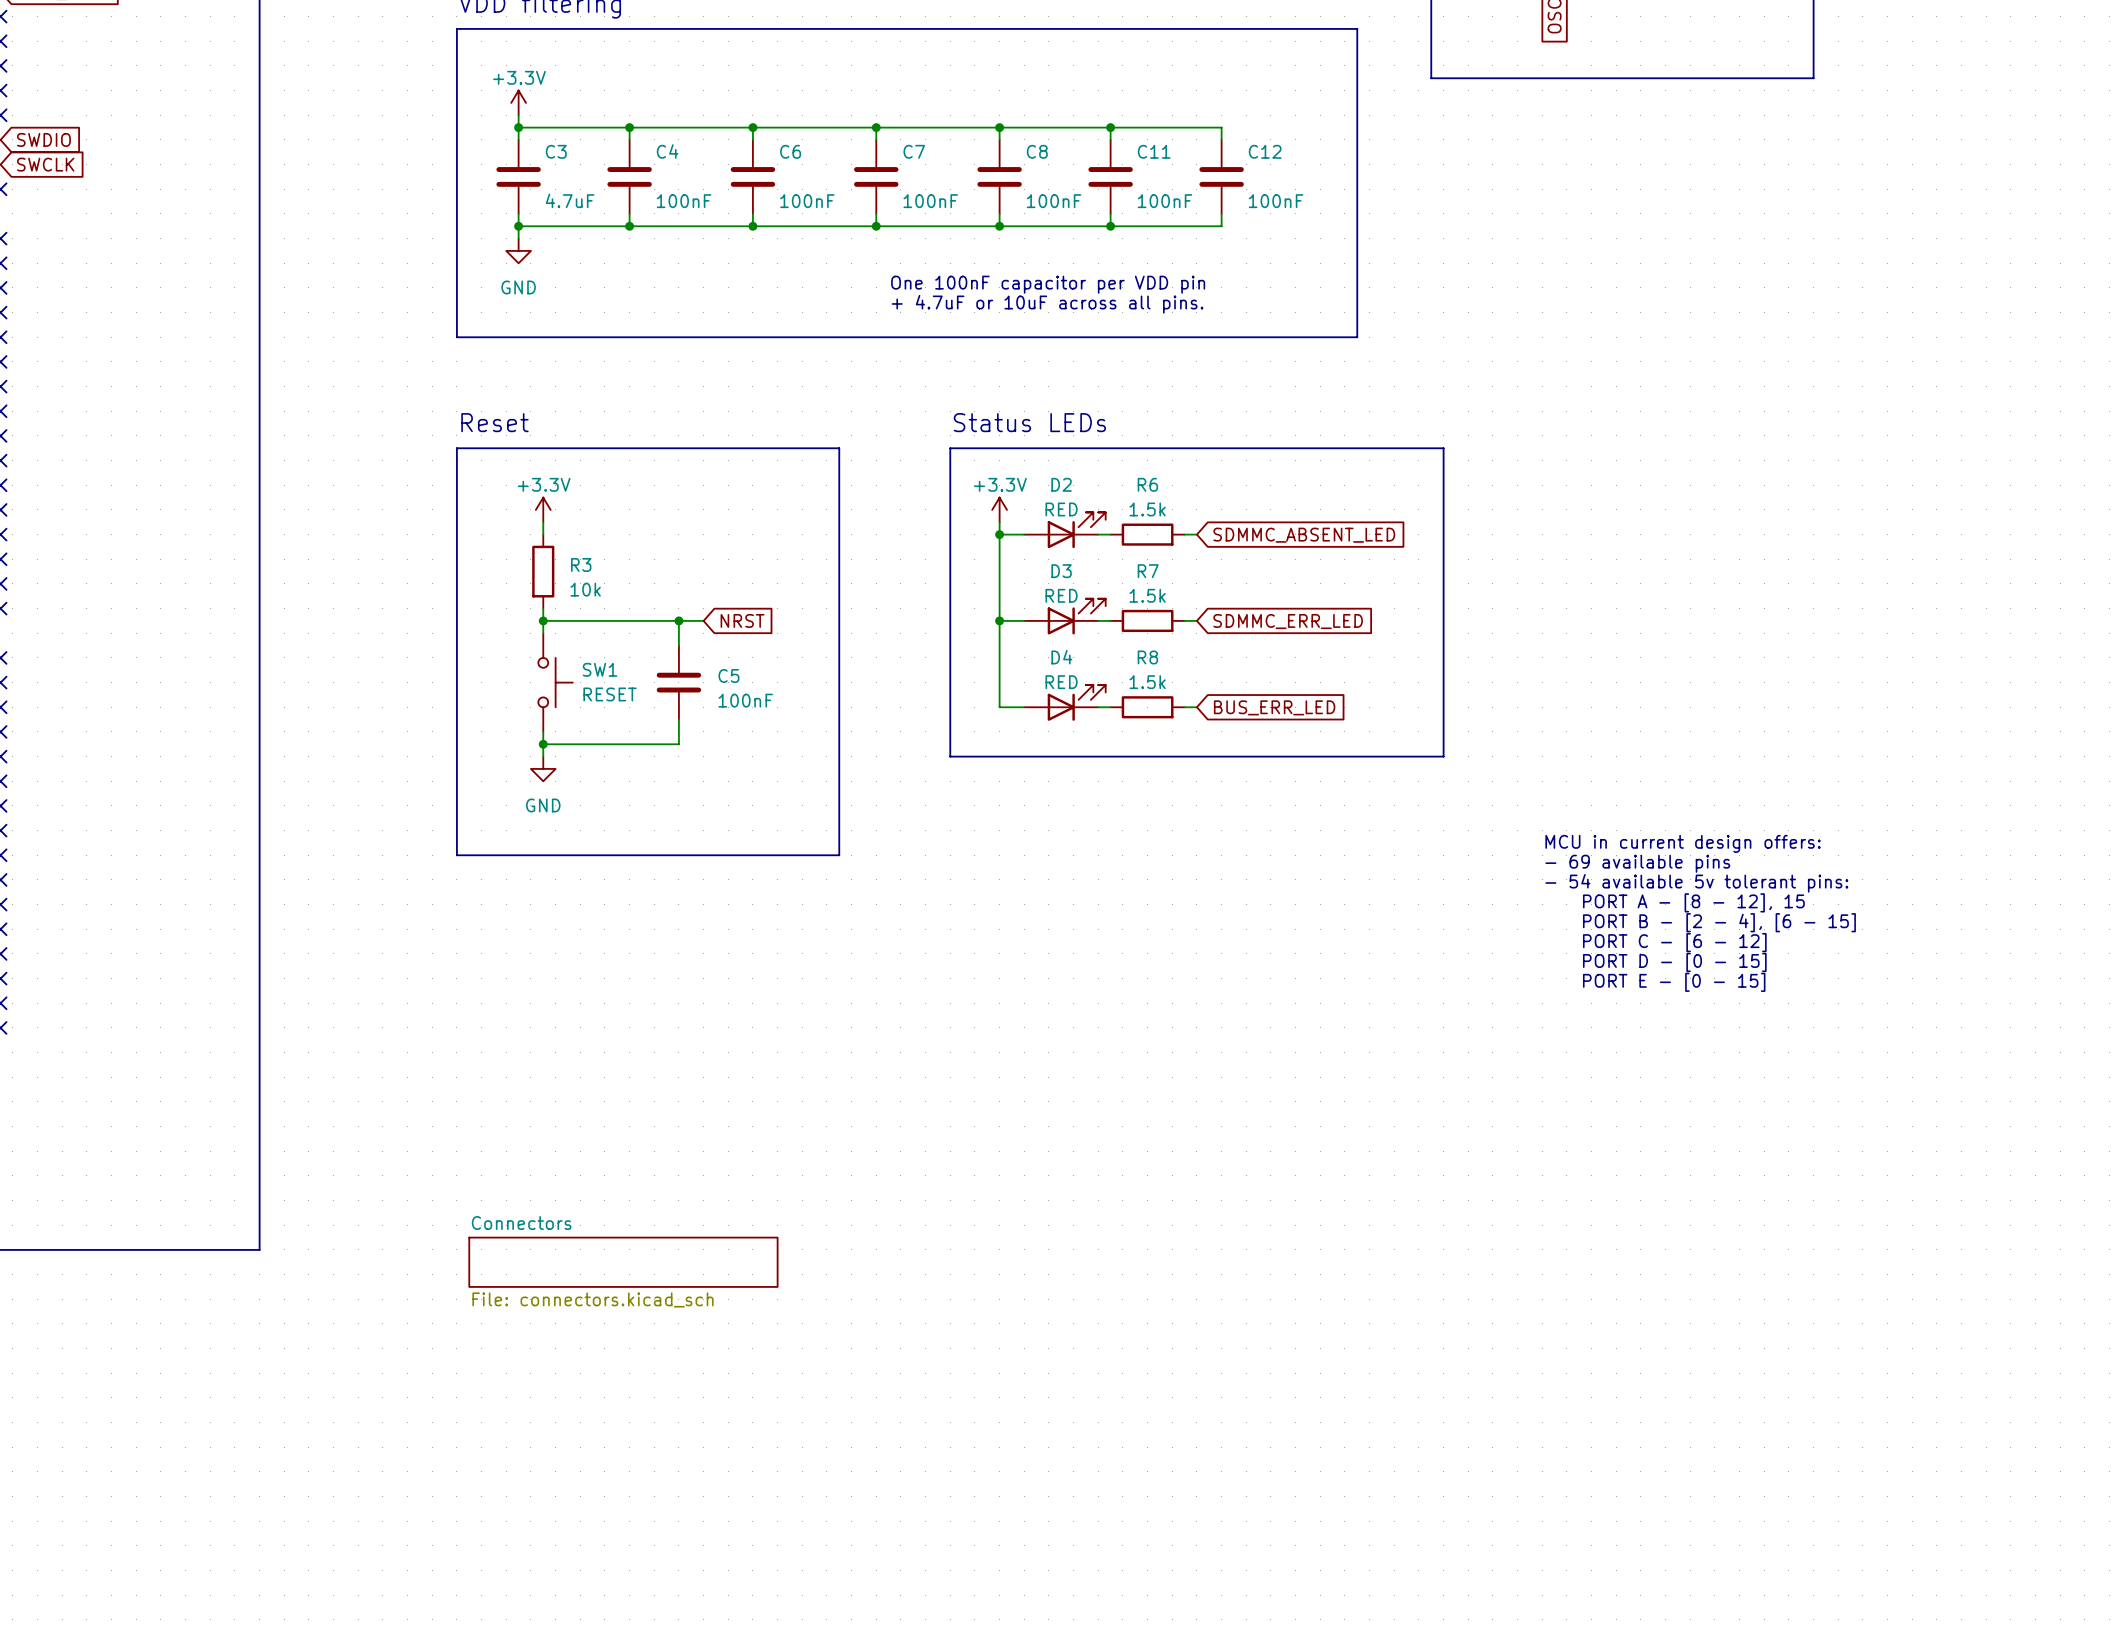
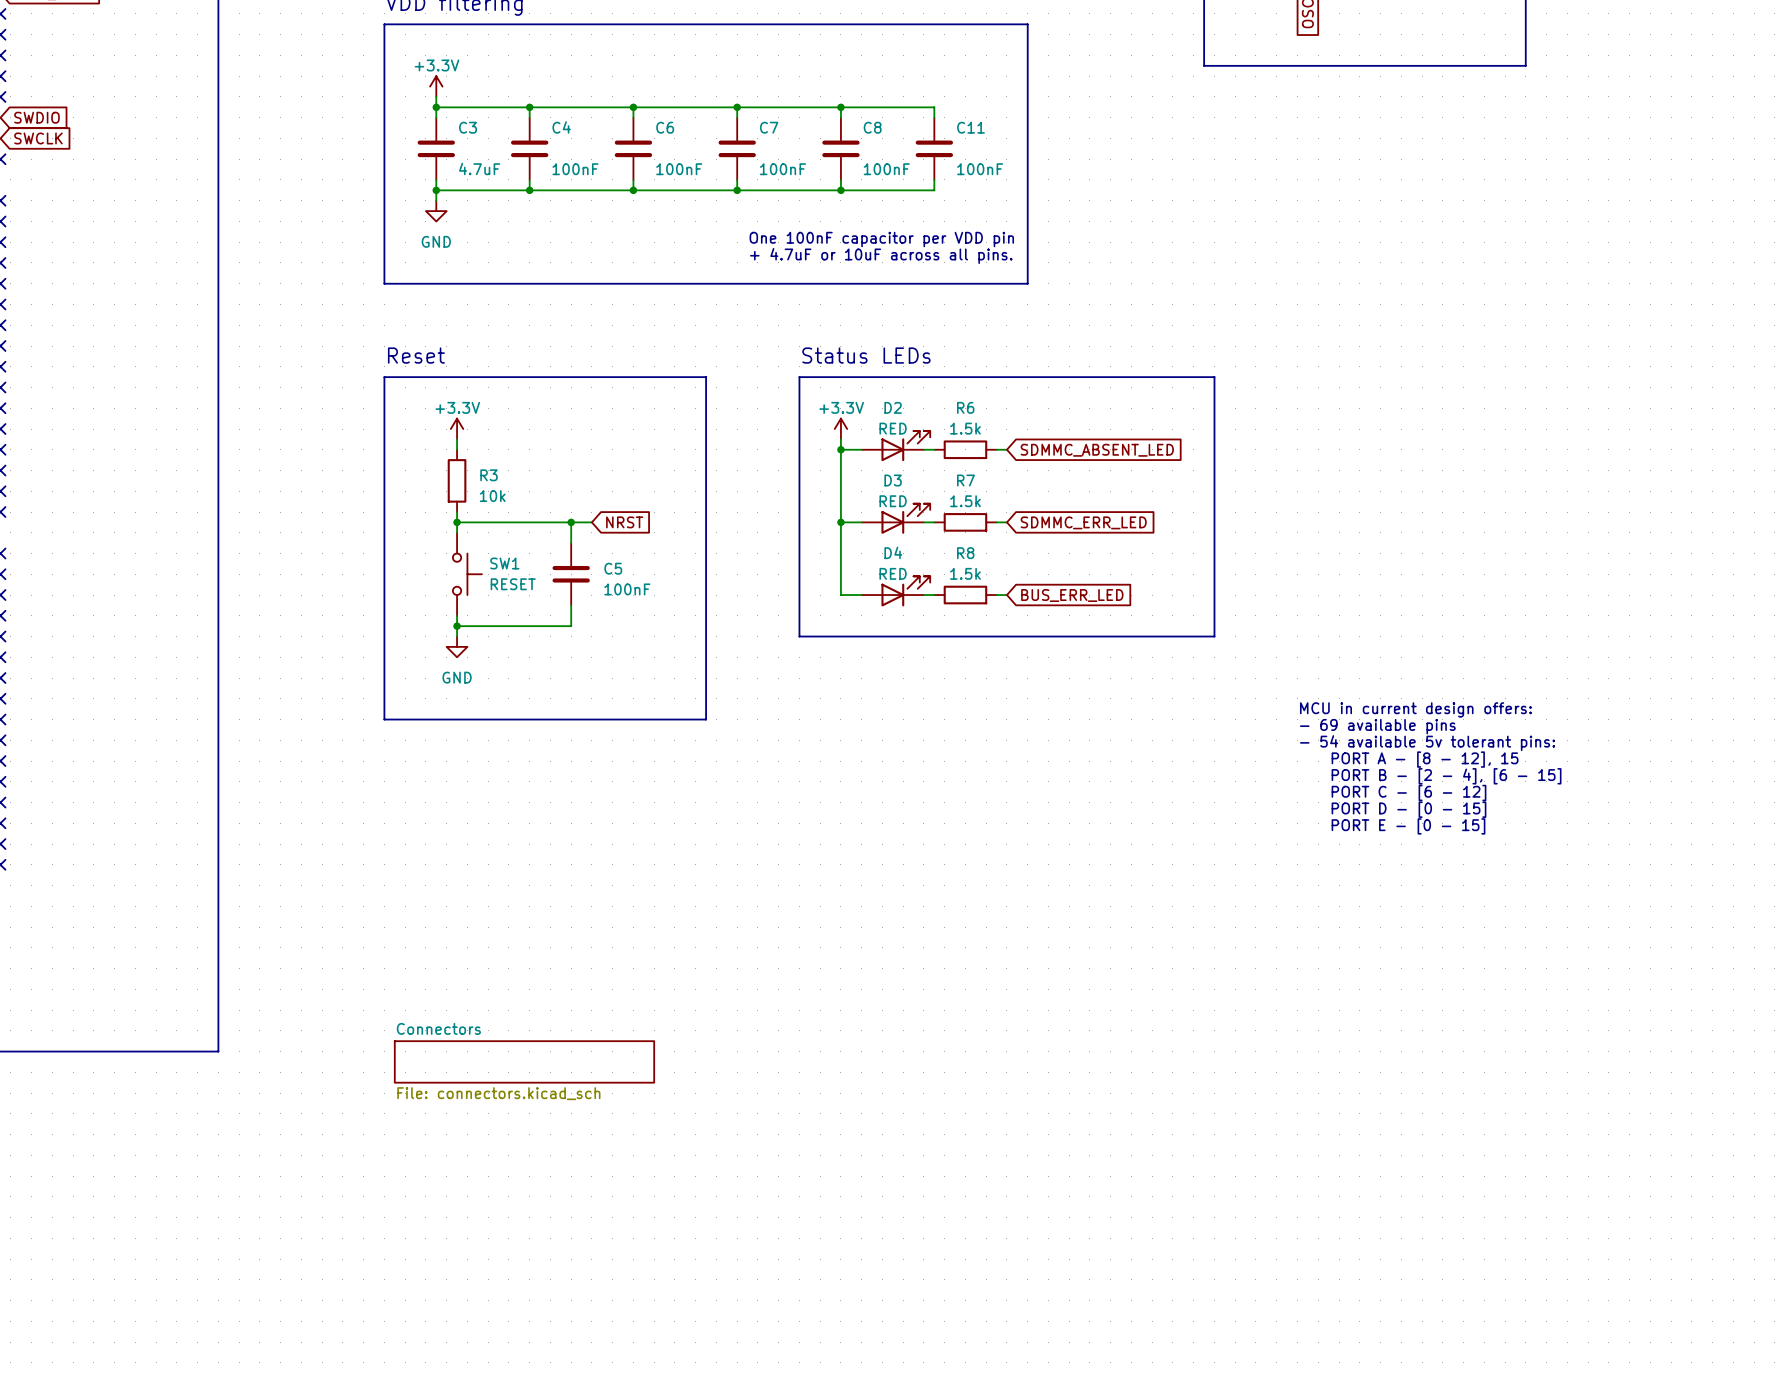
line: (1221, 28) (1357, 28) (1357, 337) (1221, 337) -> (1027, 24) (1027, 283)
wire: (1110, 127) (1221, 127) (1221, 139) -> none
junction: (1110, 127) -> none
C12: 100nF (1221, 176) -> none
wire: (1221, 213) (1221, 226) (1110, 226) -> none
junction: (1110, 226) -> none

